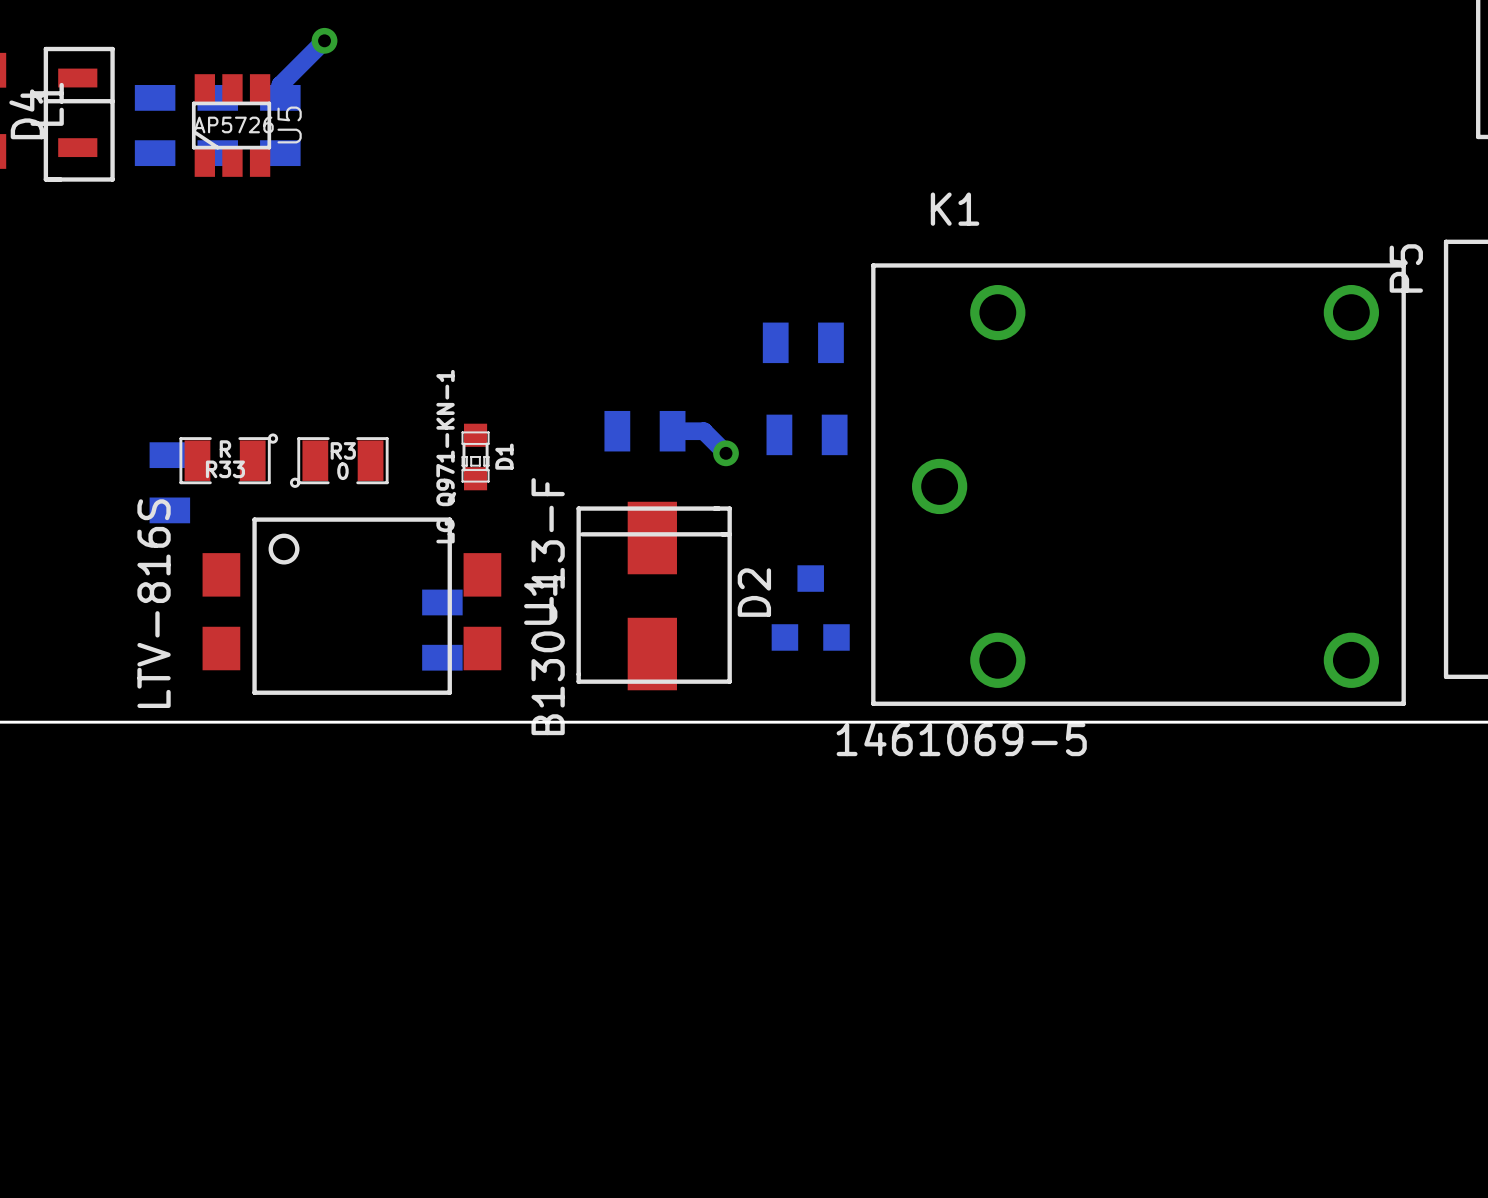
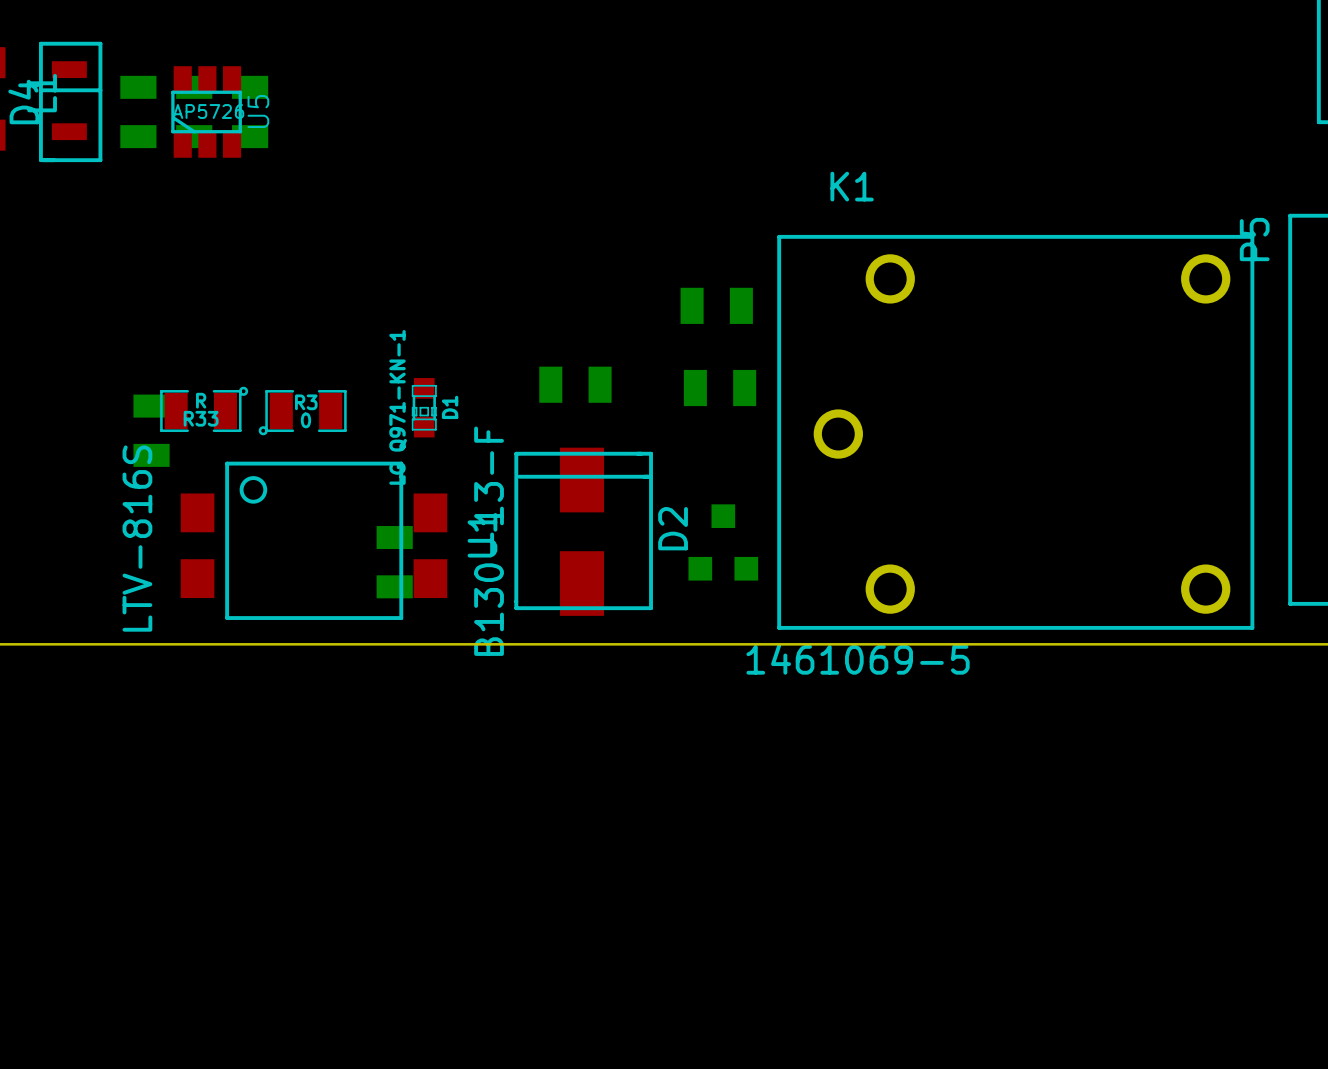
bottom track: (324, 40) (280, 85) (280, 97) -> none
via: (324, 40) -> none
bottom track: (672, 431) (703, 431) (725, 453) -> none
via: (725, 453) -> none

